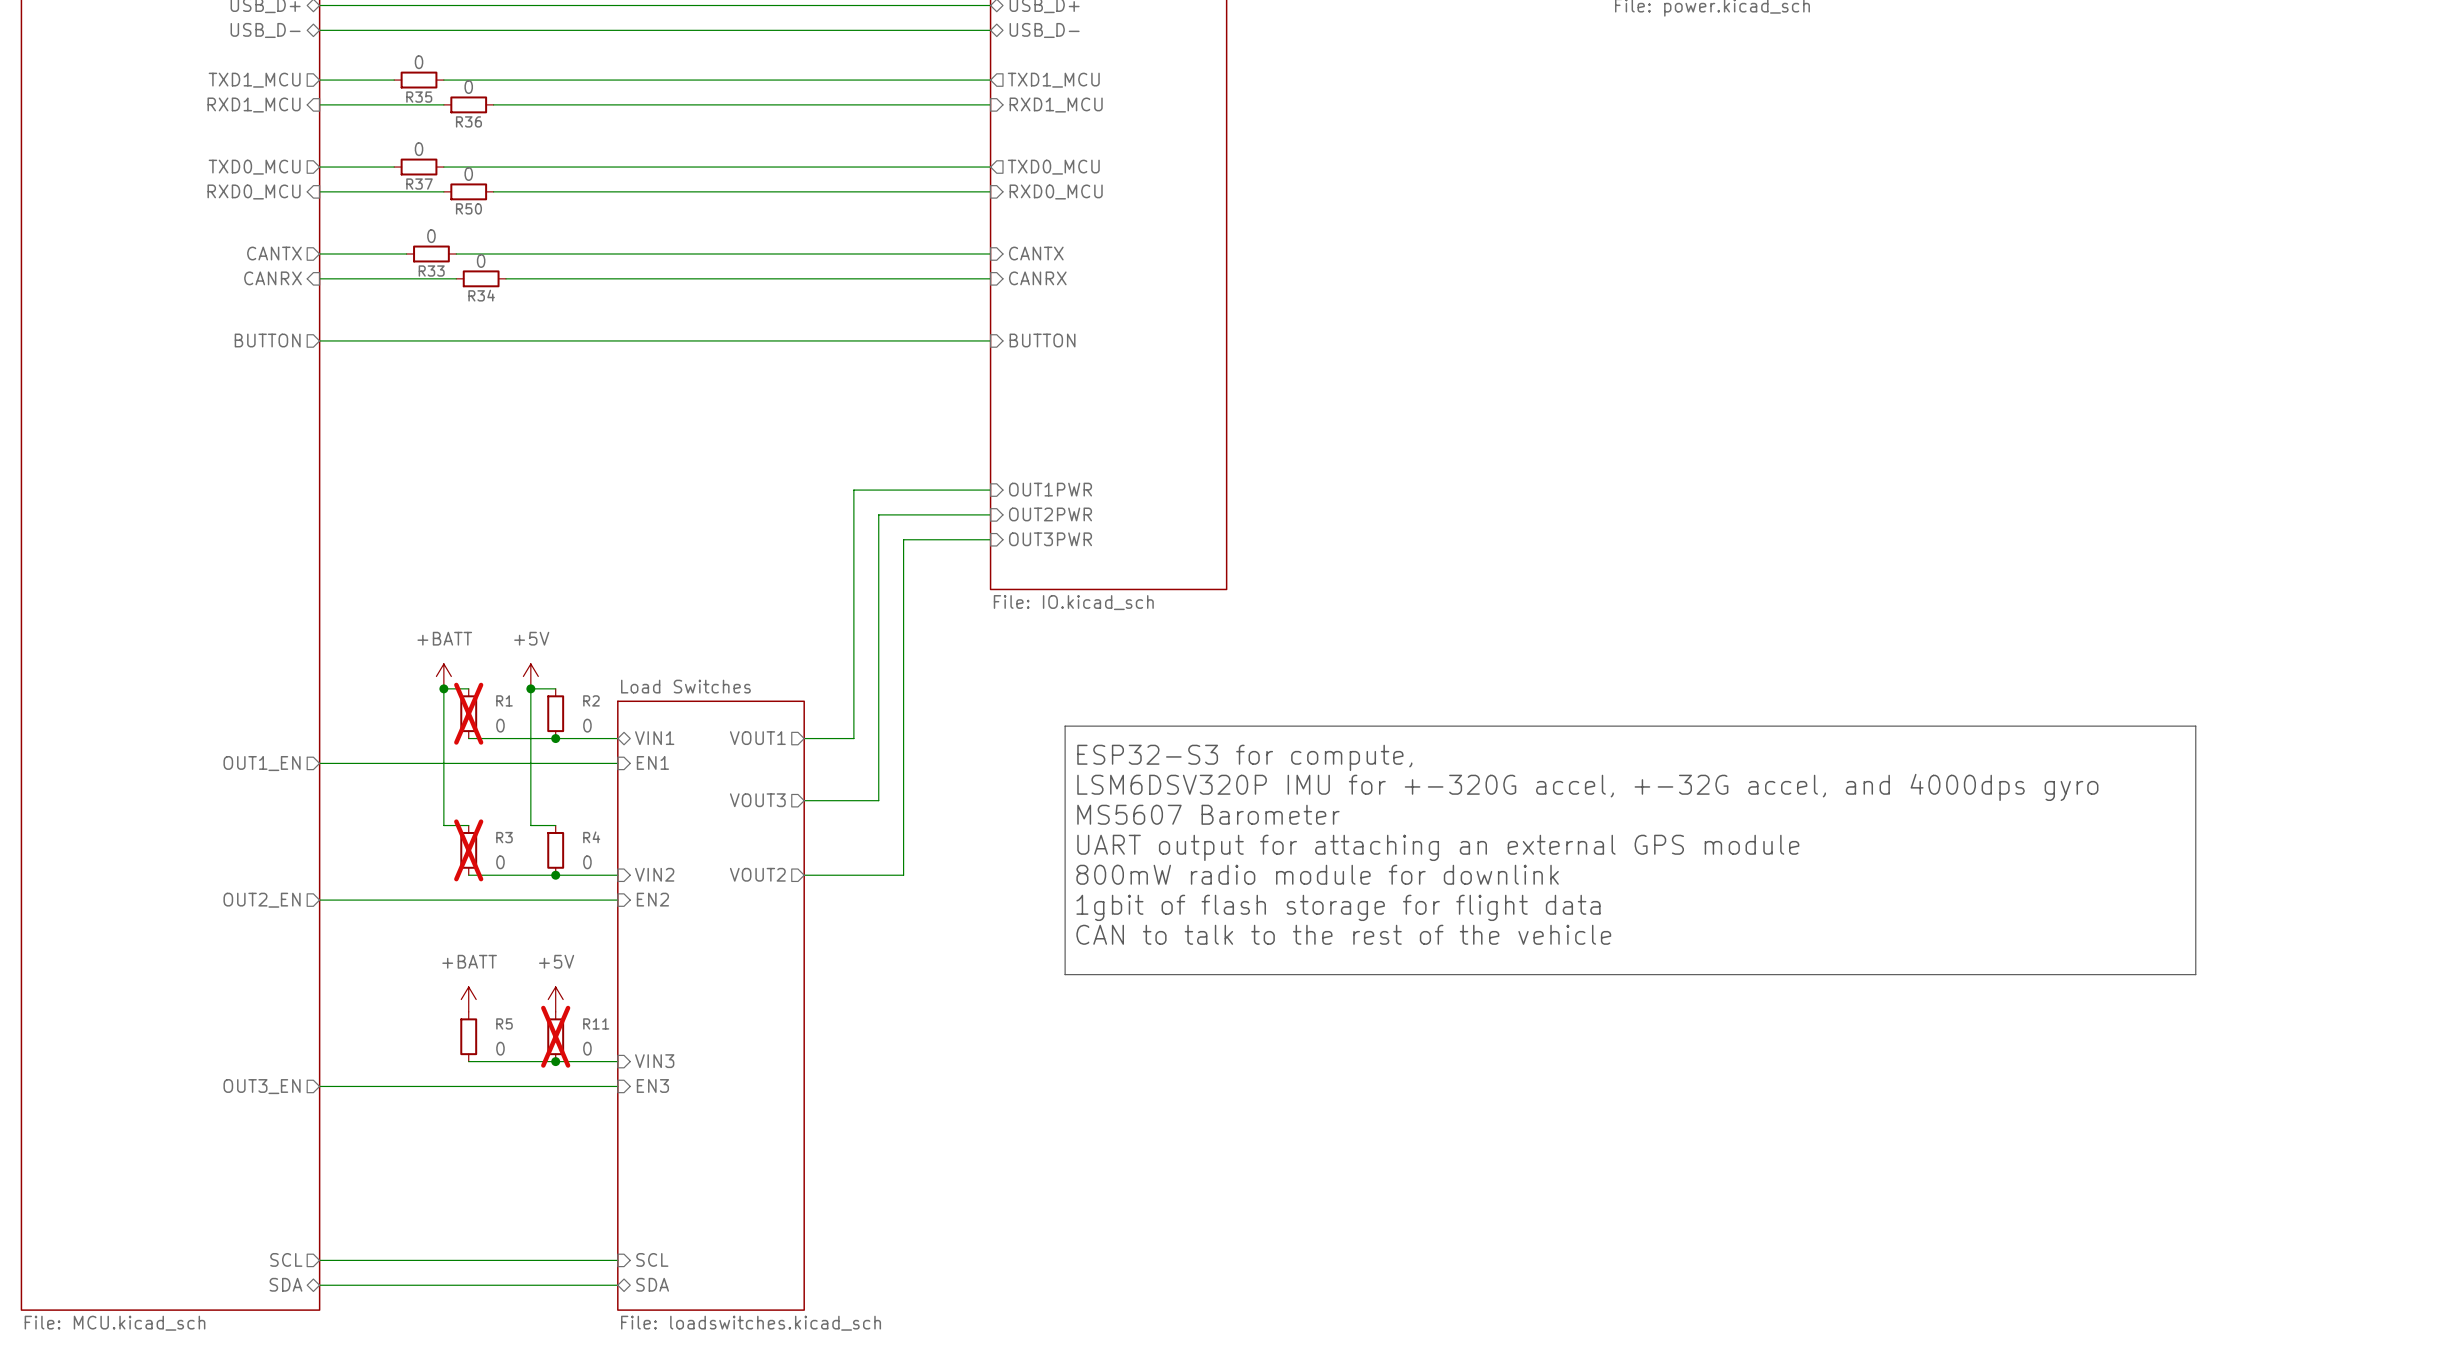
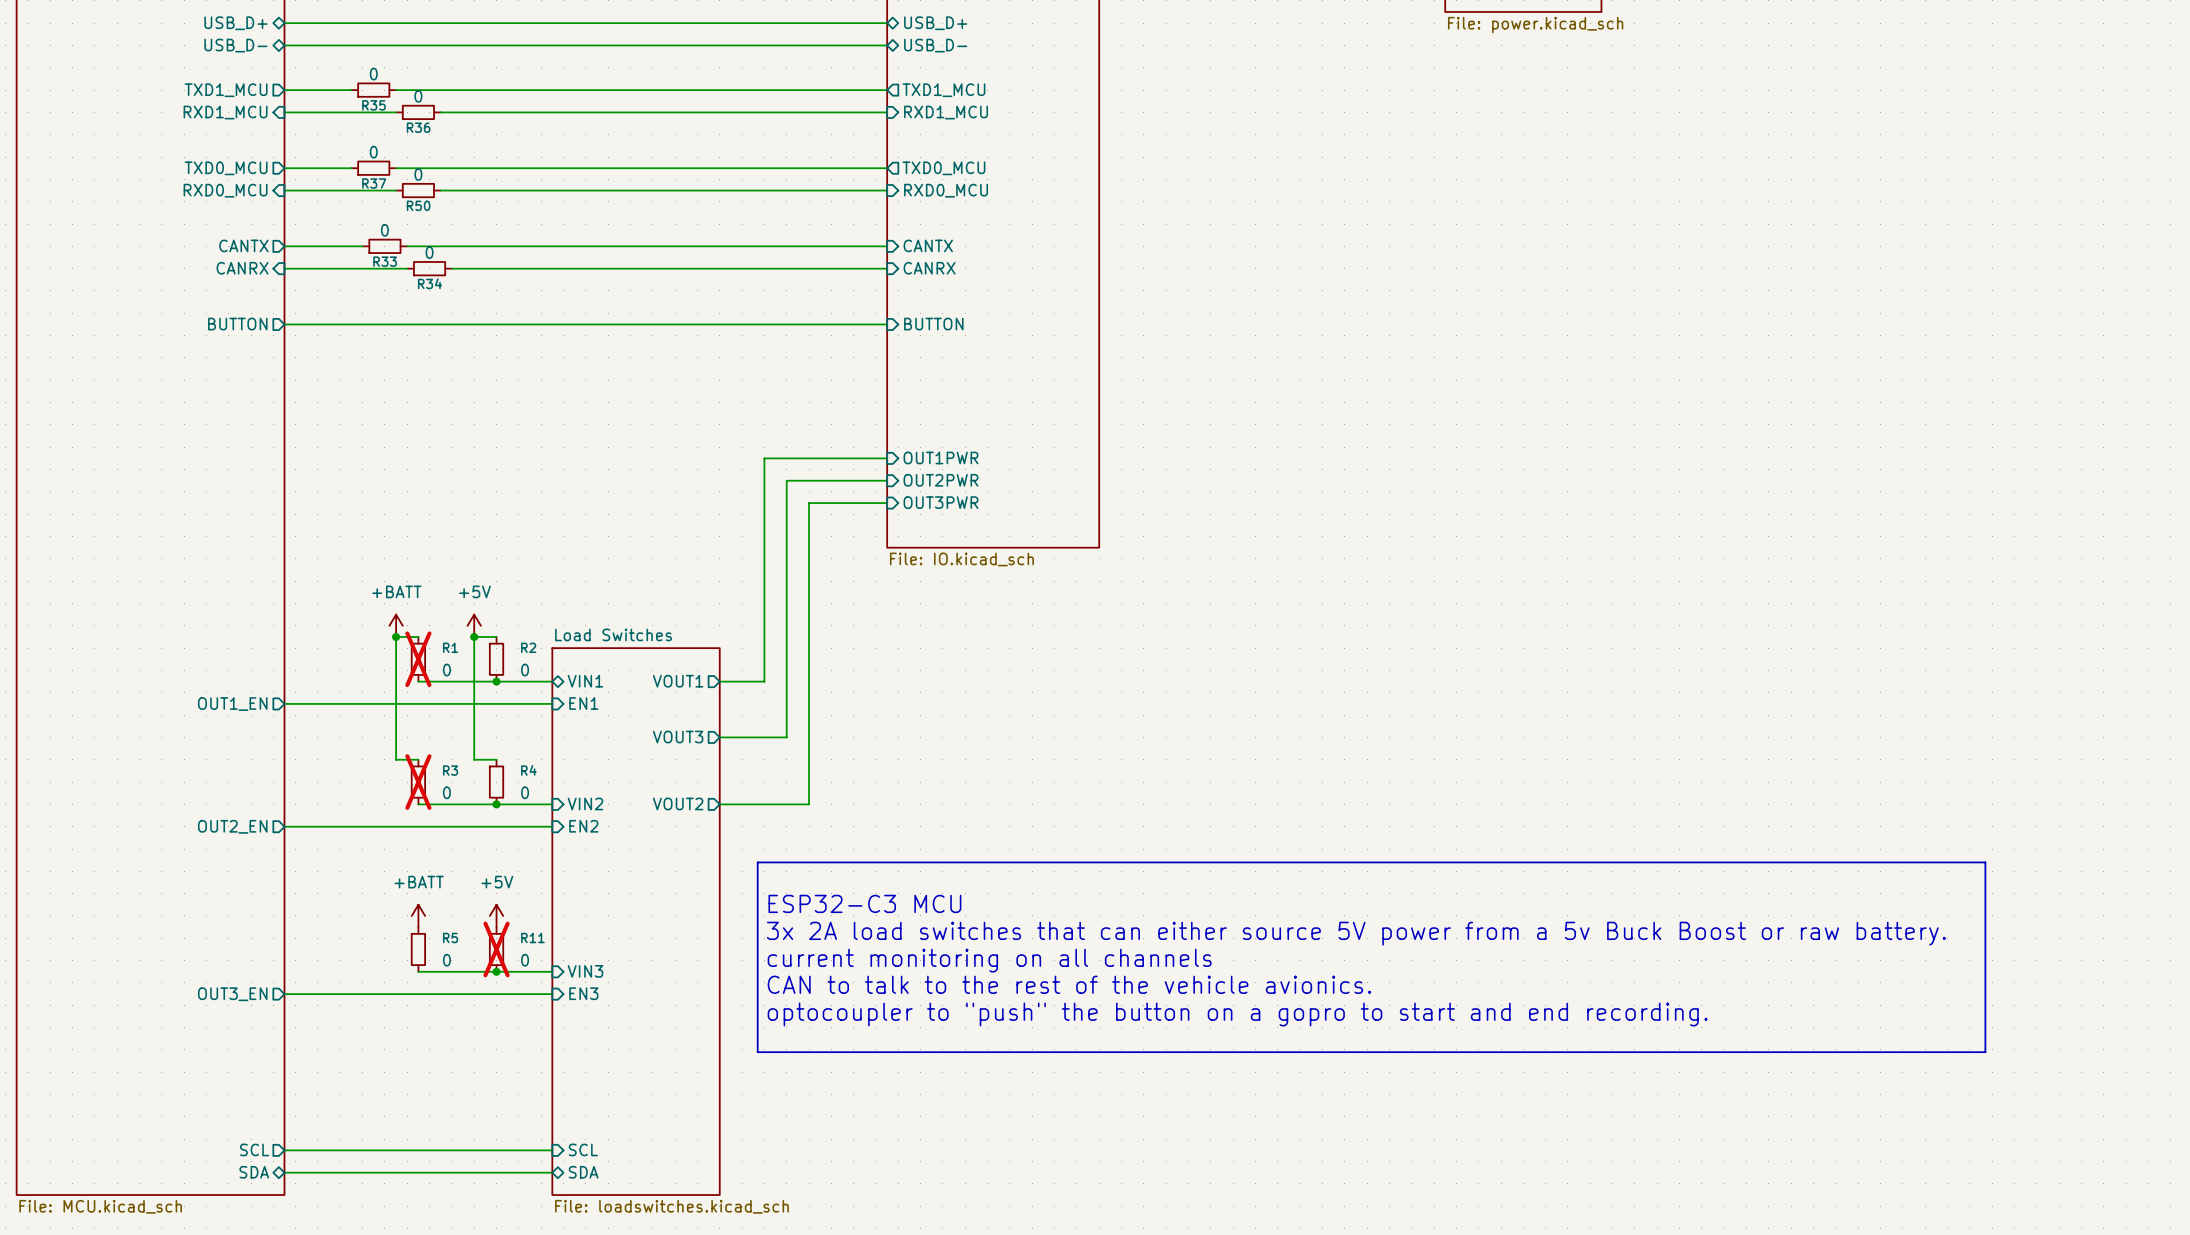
line: (1065, 726) (2195, 726) (2195, 974) (1065, 974) (1065, 726) -> none
text: ESP32-S3 for compute, (1244, 757) -> none
text: LSM6DSV320P IMU for +-320G accel, +-32G accel, and 4000dps gyro (1587, 787) -> none
text: MS5607 Barometer (1208, 814) -> none
text: UART output for attaching an external GPS module (1438, 847) -> none
text: 800mW radio module for downlink (1317, 874) -> none
text: 1gbit of flash storage for flight data (1338, 907) -> none
text: CAN to talk to the rest of the vehicle (1343, 934) -> none
line: none -> (757, 862) (1985, 862) (1985, 1052) (757, 1052) (757, 862)
text: none -> ESP32-C3 MCU (864, 903)
text: none -> 3x 2A load switches that can either source 5V power from a 5v Buck Boost or raw battery. (1356, 933)
text: none -> current monitoring on all channels (989, 960)
text: none -> CAN to talk to the rest of the vehicle avionics. (1069, 984)
text: none -> optocoupler to "push" the button on a gopro to start and end recording. (1237, 1014)

